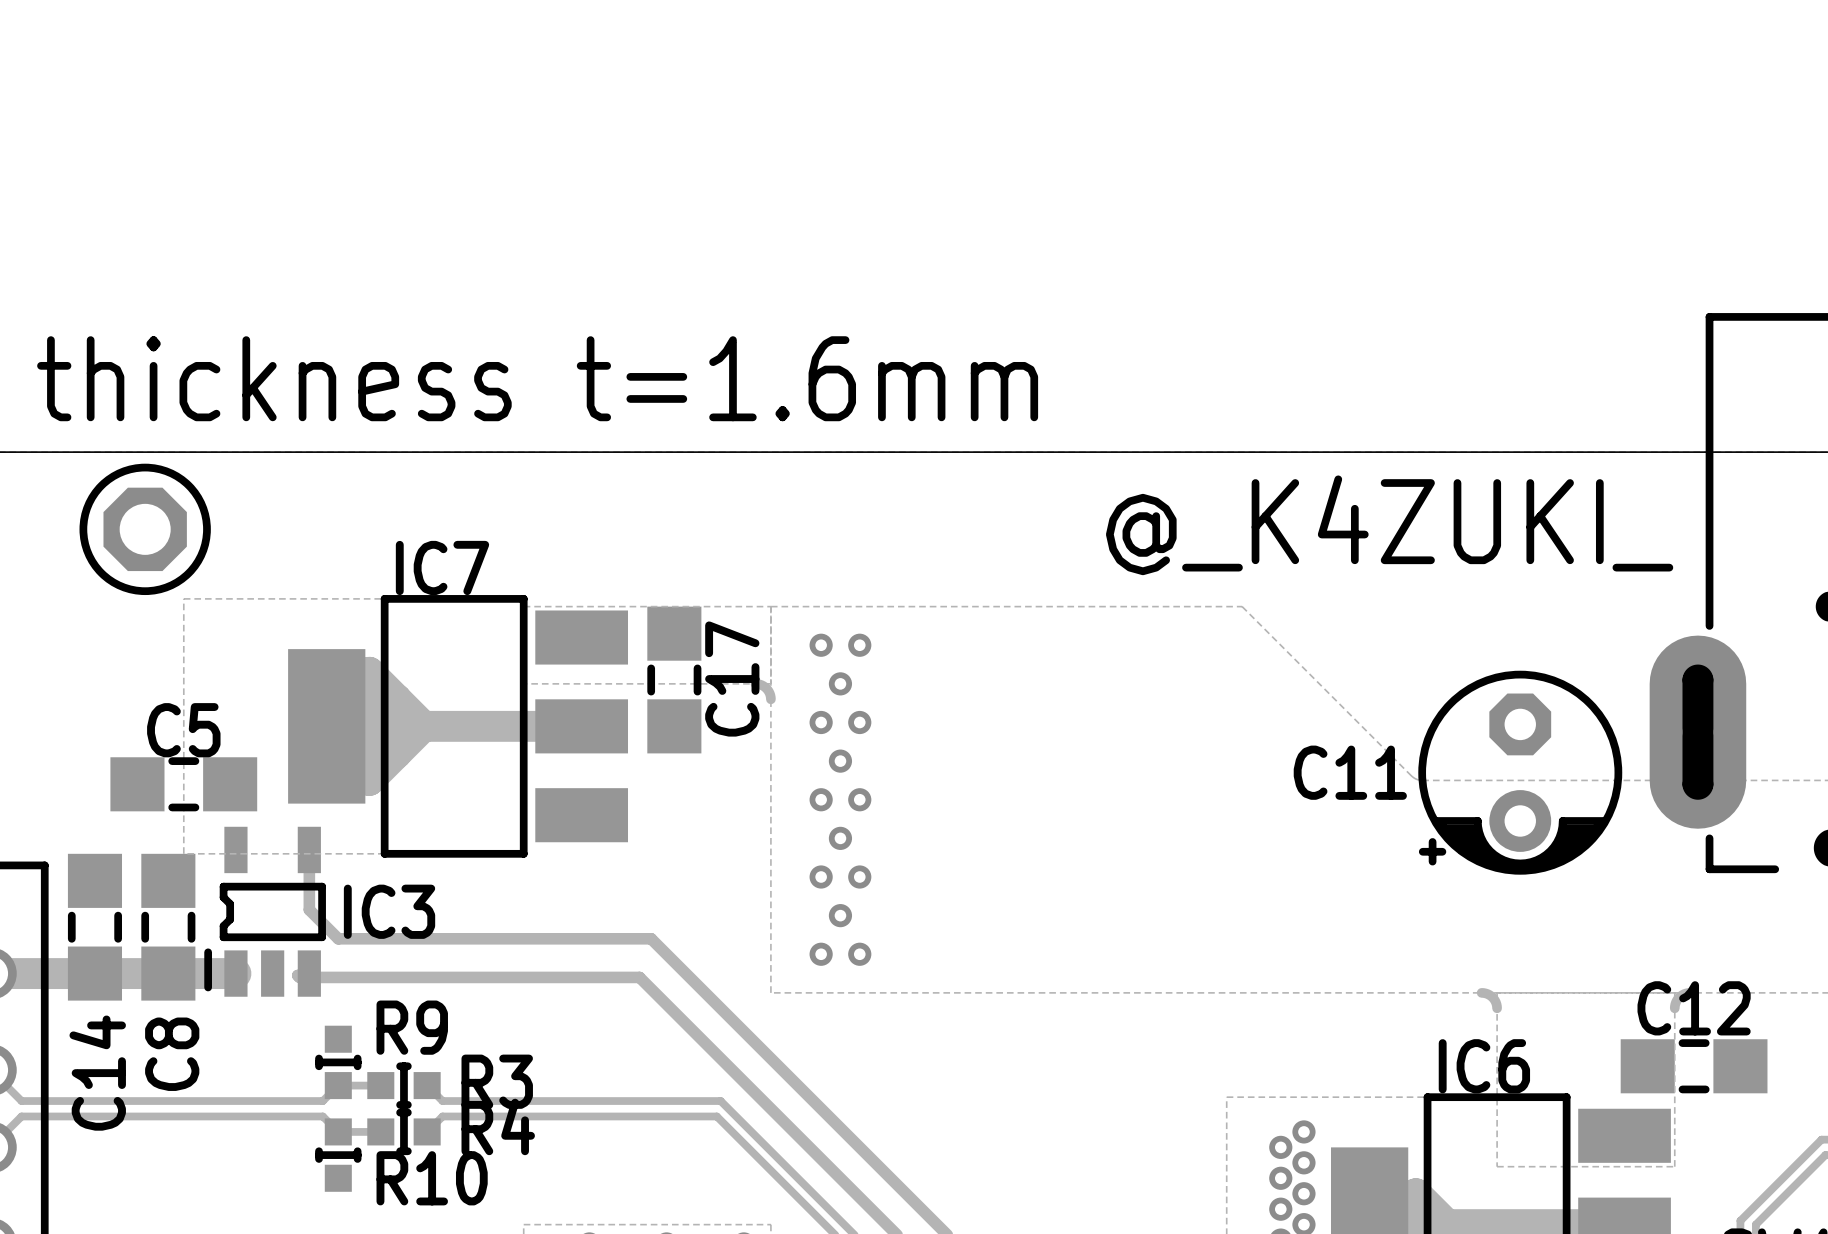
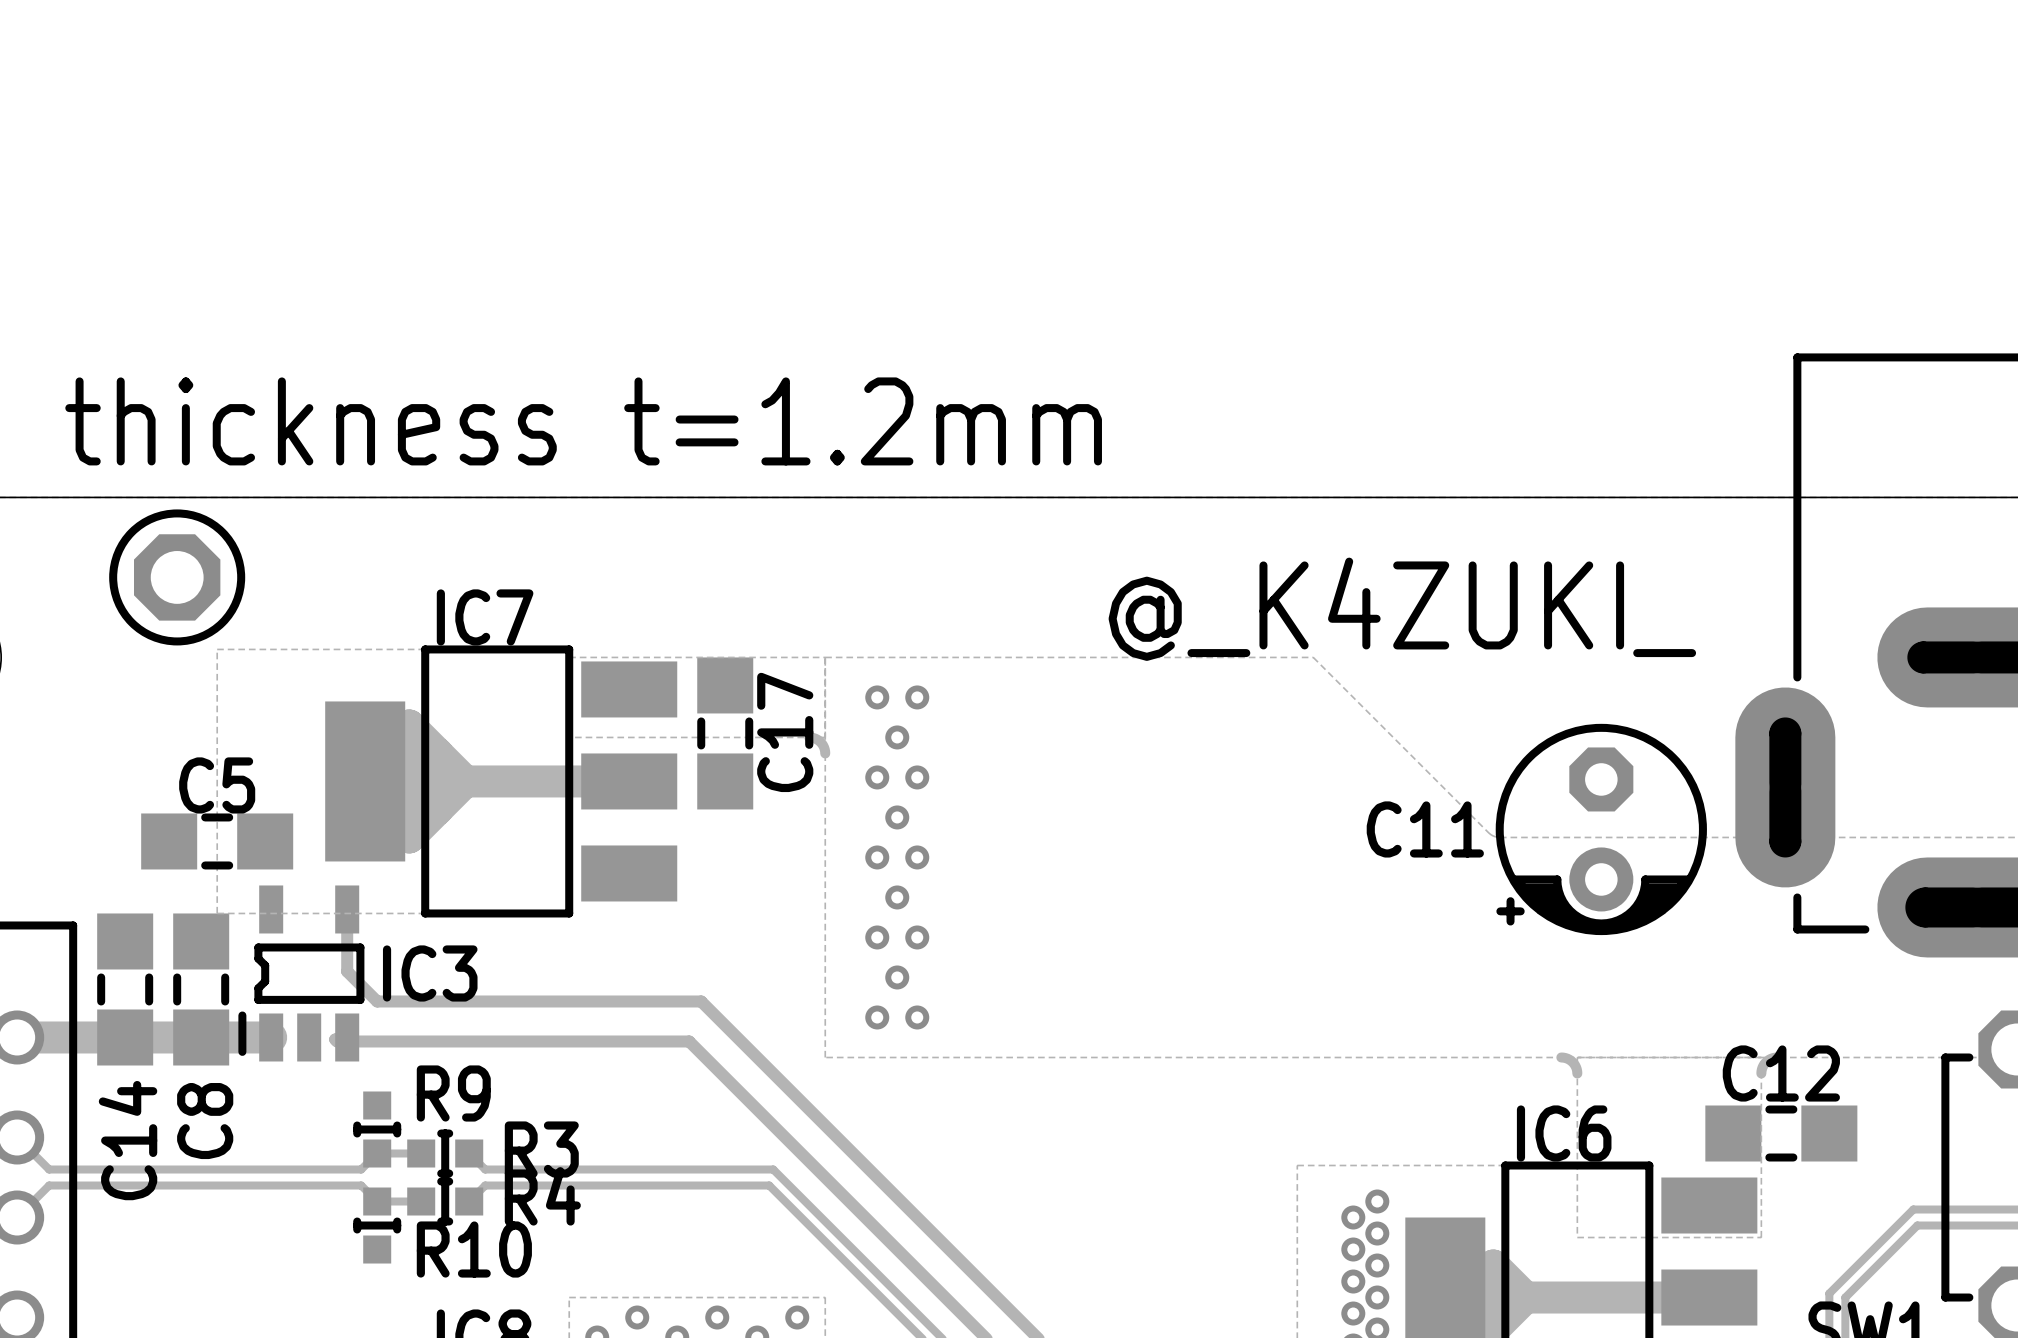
text: thickness t=1.6mm (537, 378) -> thickness t=1.2mm (583, 421)
text position: @_K4ZUKI_ (1389, 525) -> @_K4ZUKI_ (1402, 609)

